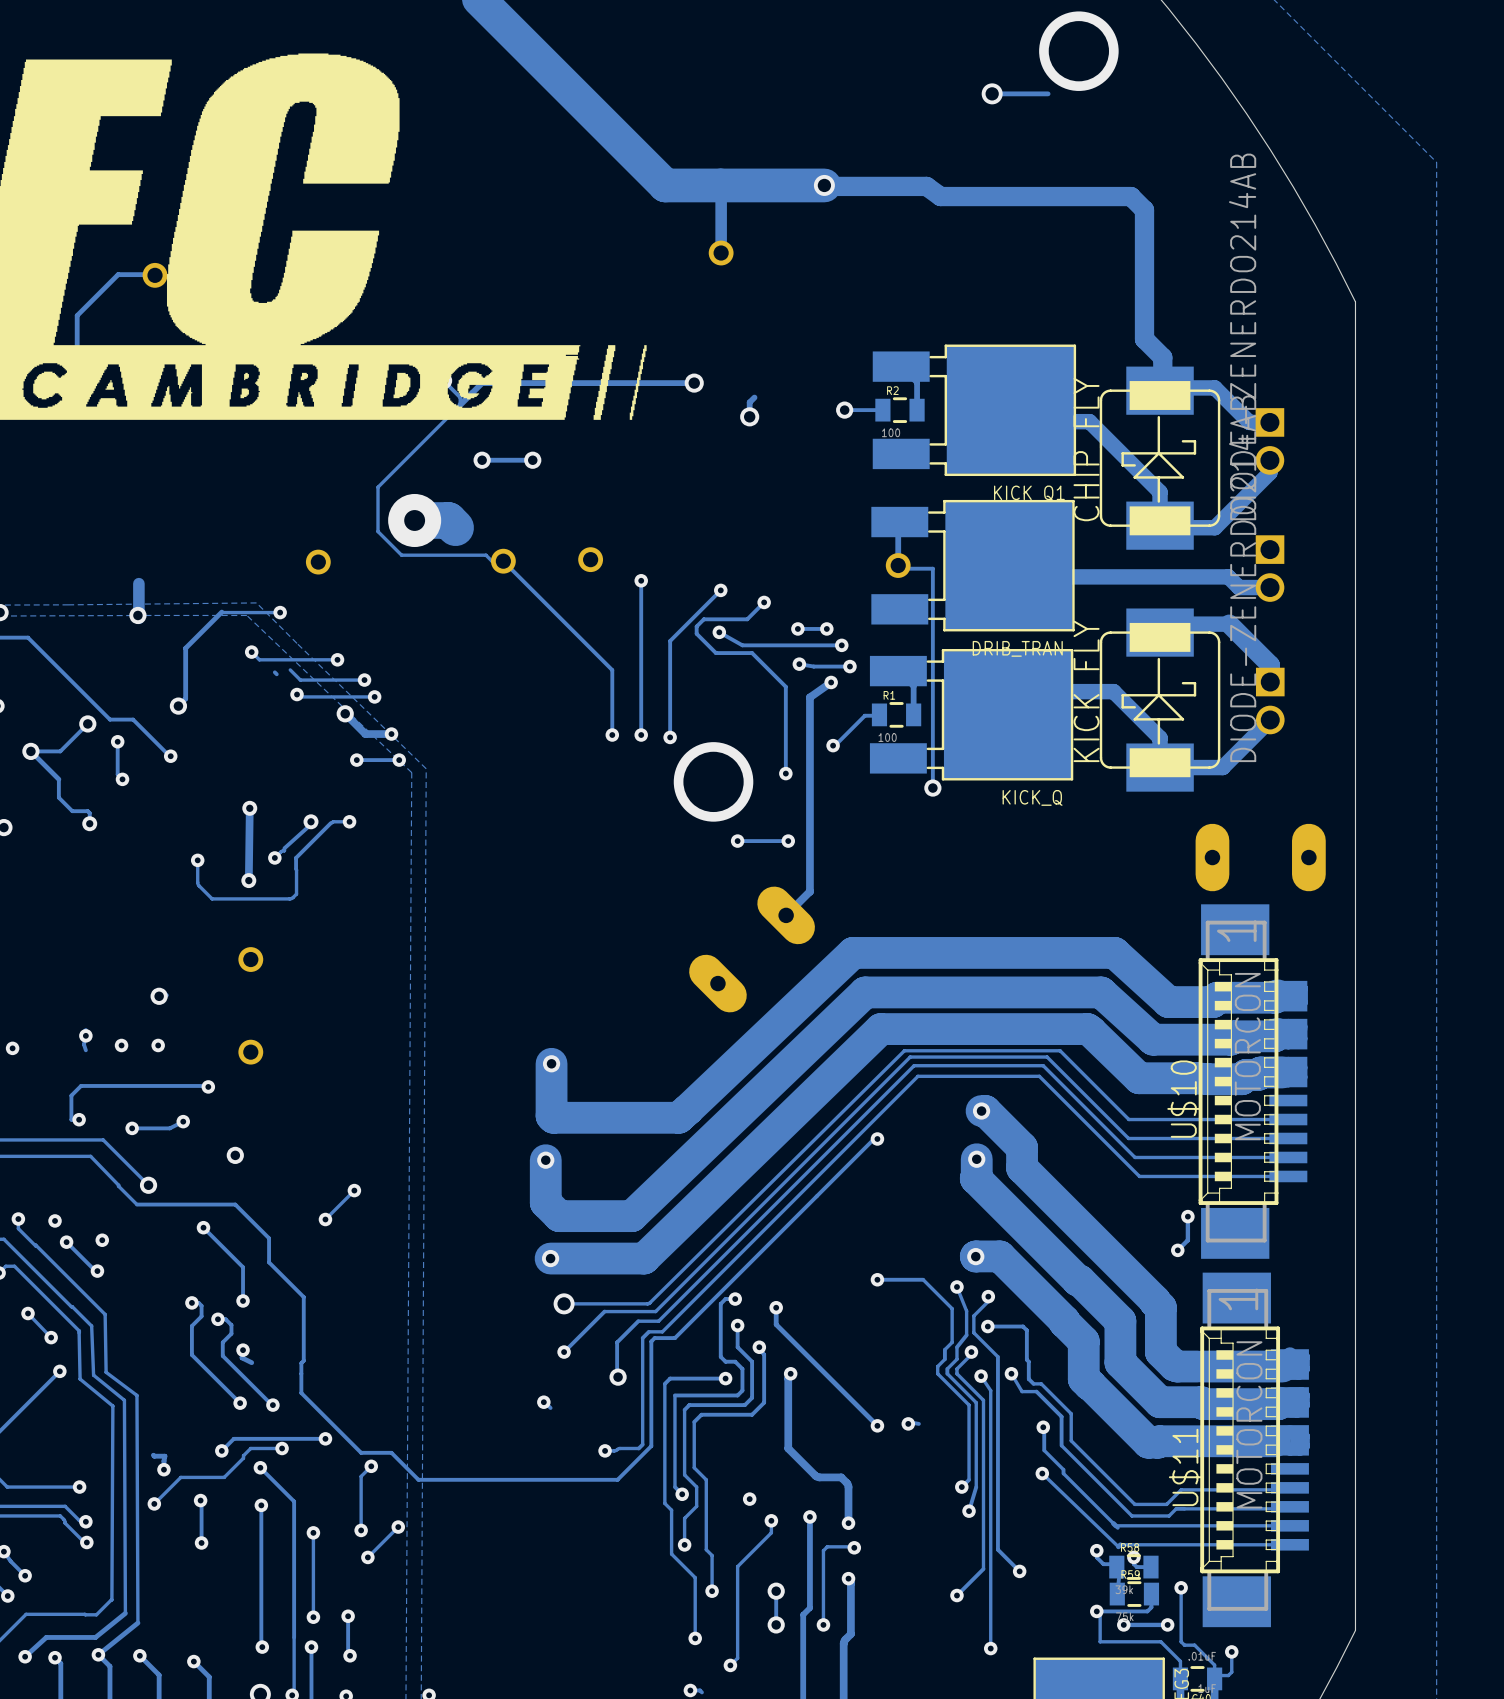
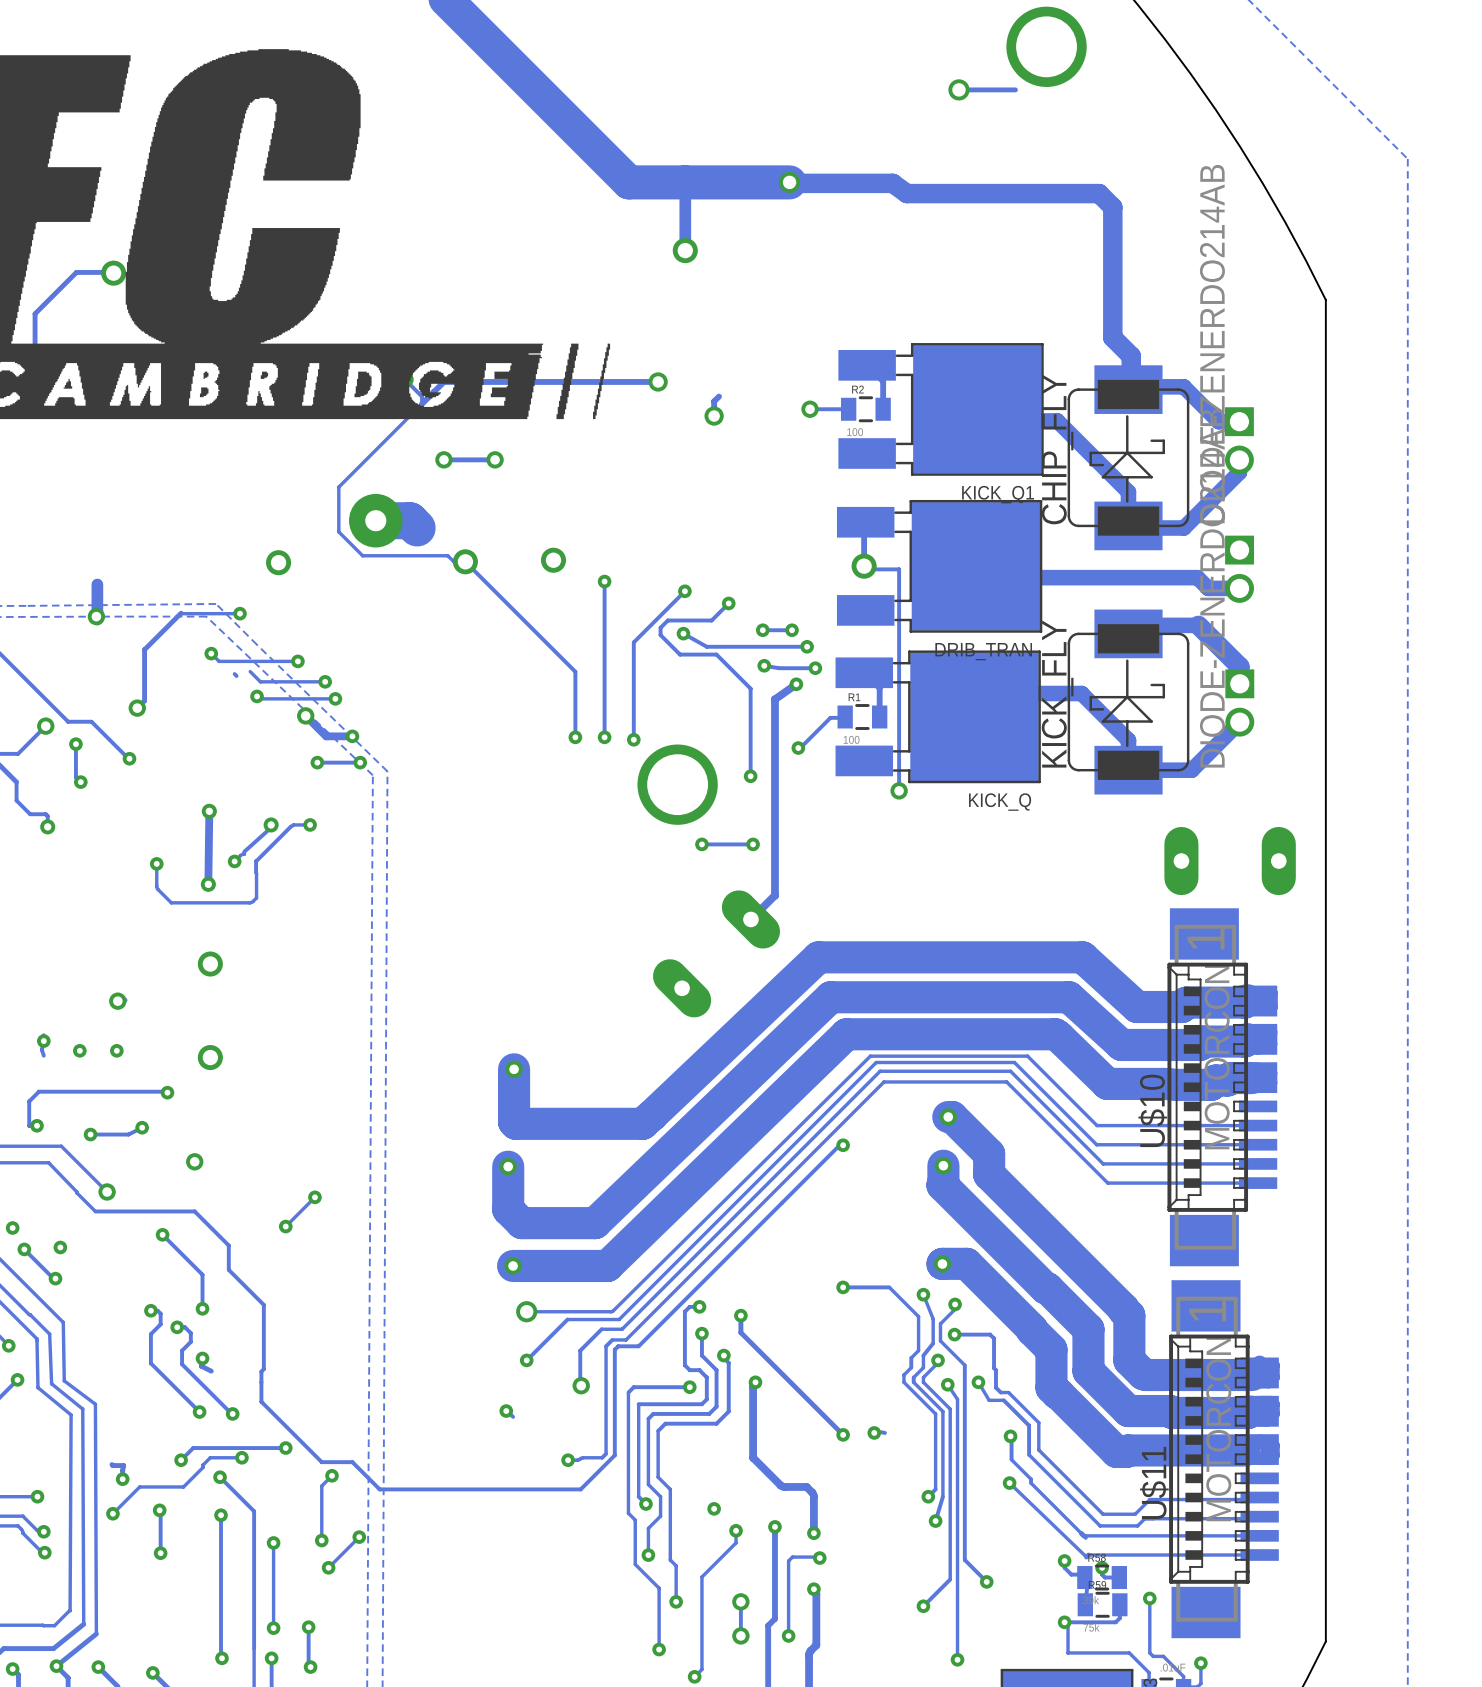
track: (1187, 1216) (1187, 1240) (1177, 1250) -> none
via: (1187, 1216) -> none
via: (1177, 1250) -> none
via: (1123, 1624) -> none
track: (1167, 1624) (1123, 1624) -> none
via: (1167, 1624) -> none

